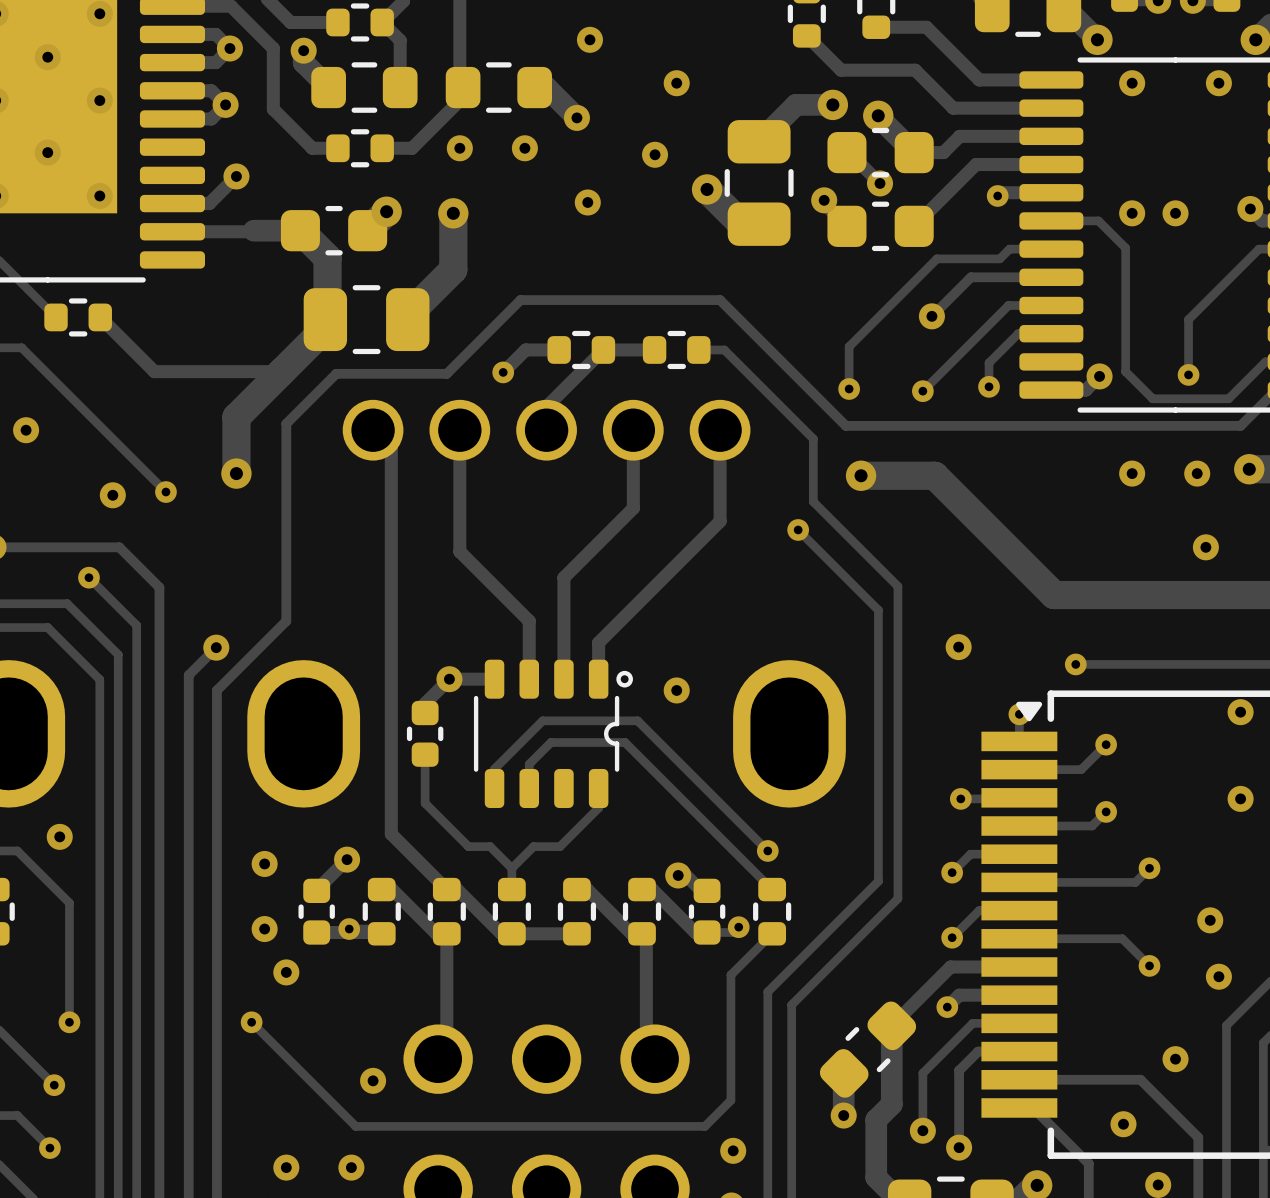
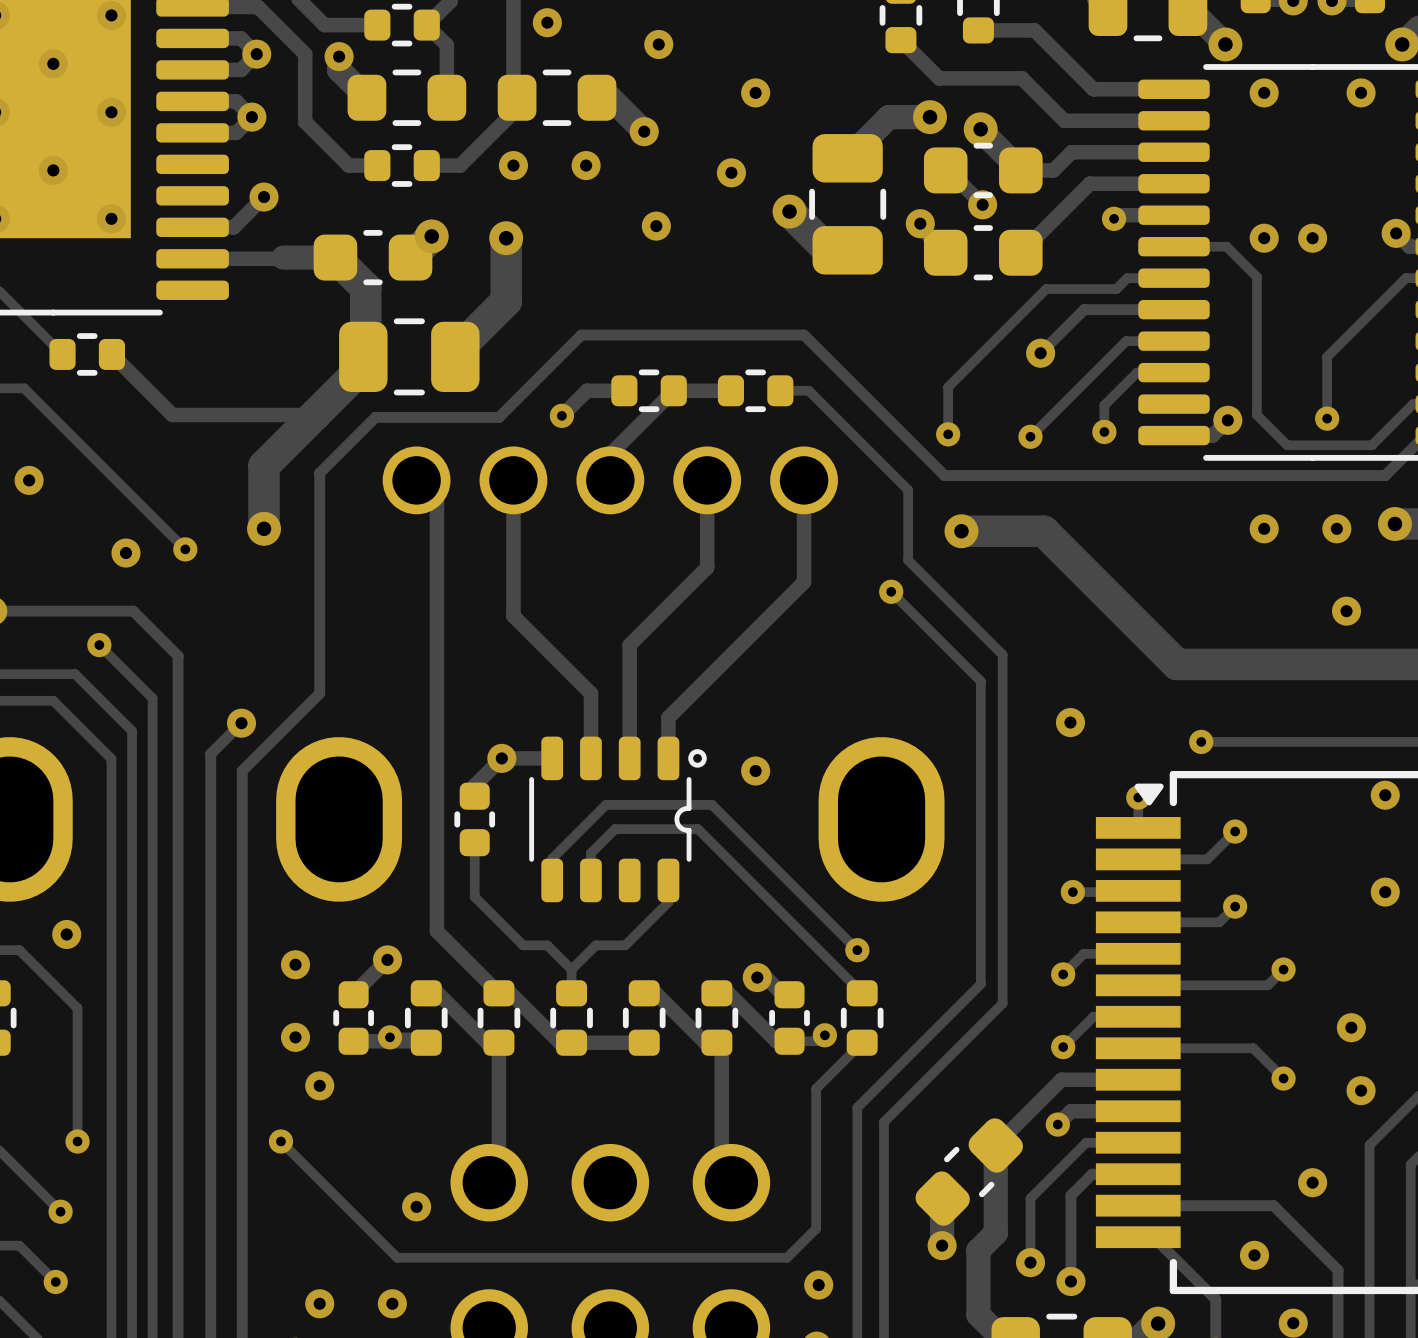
via: none -> (547, 22)

